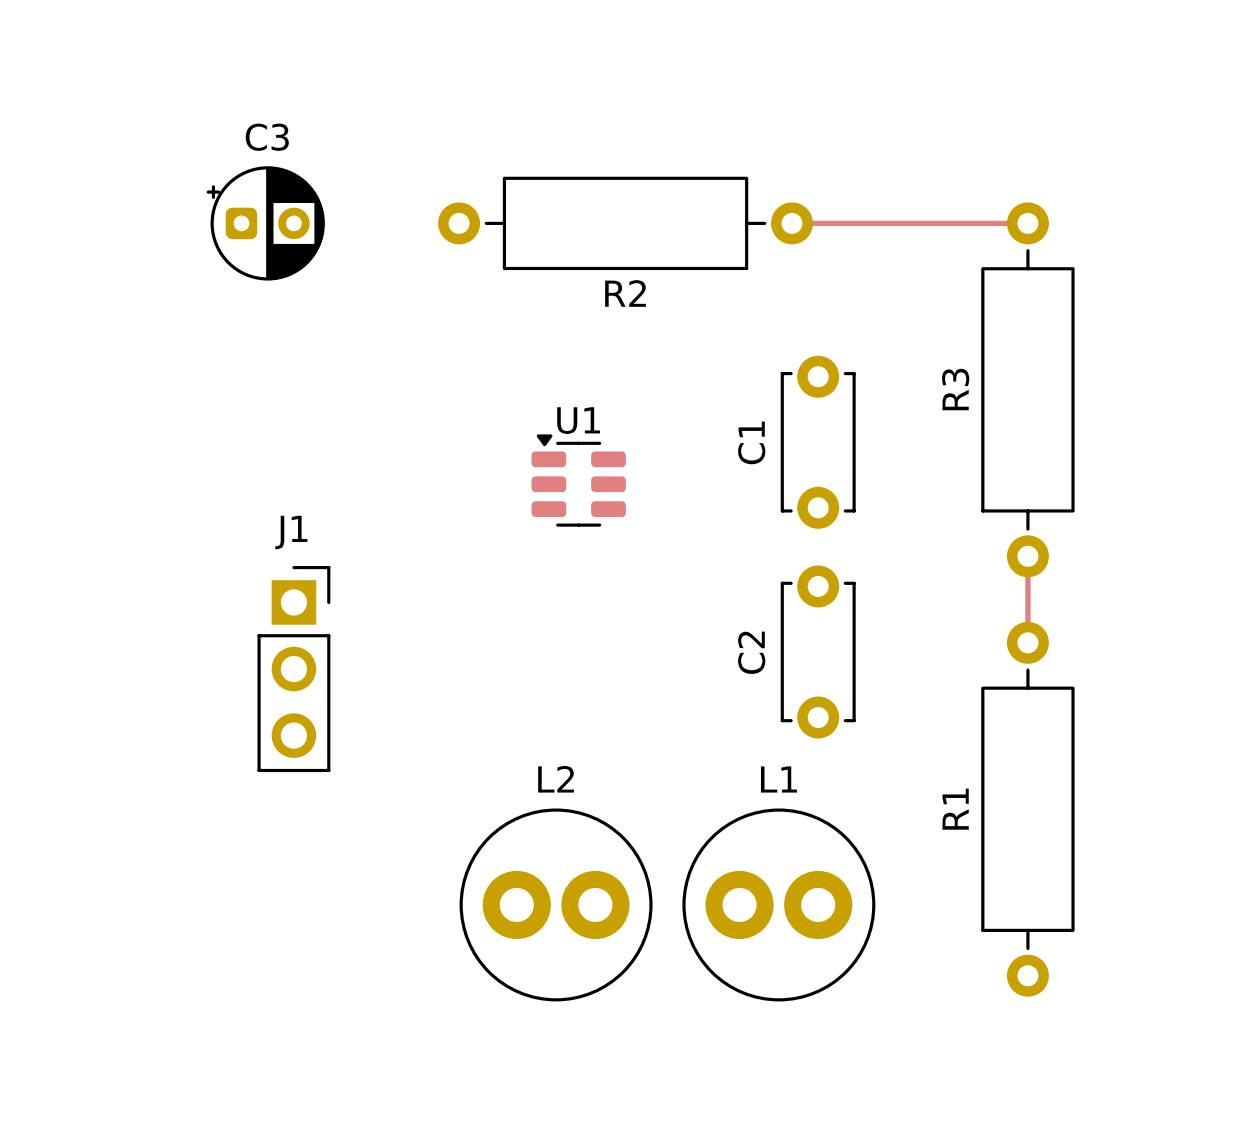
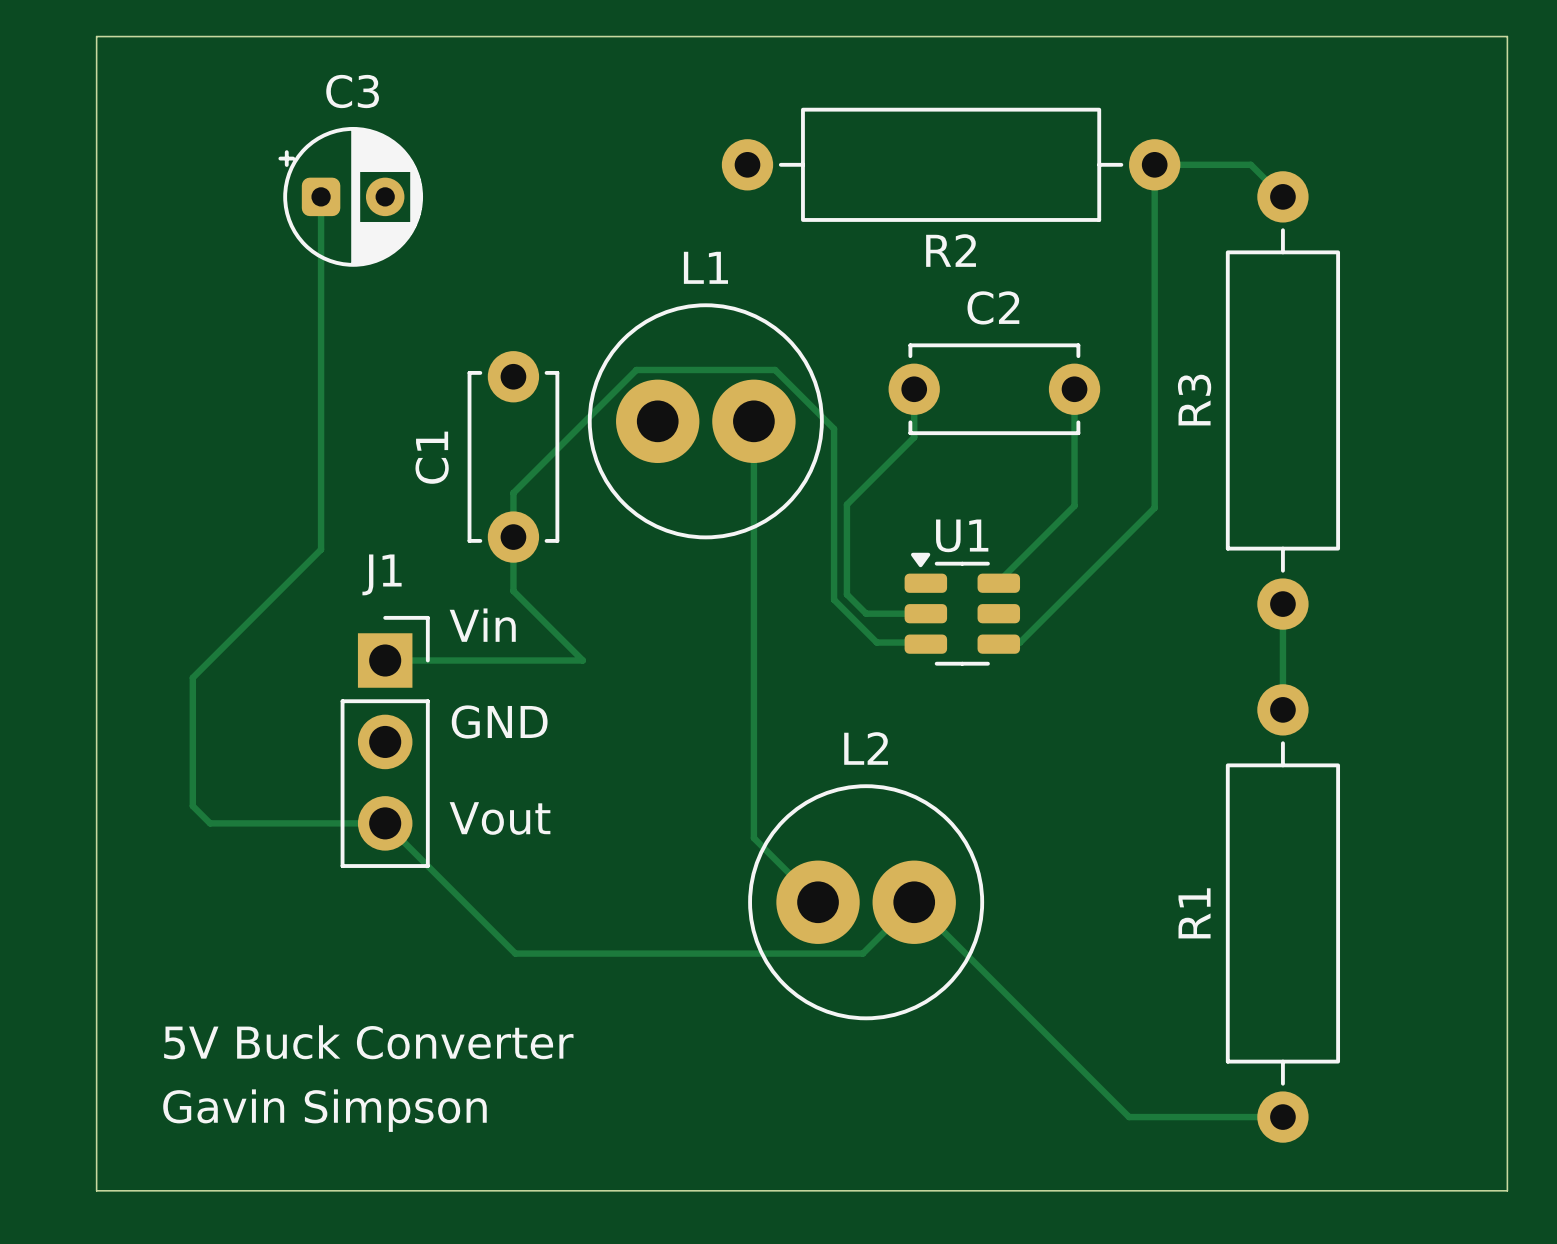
board edge: none -> (96, 36) (1507, 36) (1507, 1190) (96, 1190) (96, 36)
track: none -> (321, 196) (321, 549) (192, 677) (192, 806) (210, 823) (385, 823) (515, 953) (862, 953) (914, 902) (1129, 1117) (1282, 1117)
R2 position: (625, 223) -> (951, 164)
track: (791, 223) (1027, 223) -> (998, 642) (1020, 642) (1154, 507) (1154, 164) (1250, 164) (1282, 196)
track: none -> (914, 389) (914, 437) (846, 504) (846, 594) (866, 613) (925, 613)
track: none -> (1074, 389) (1074, 505) (998, 581)
track: none -> (753, 421) (753, 838) (818, 902)
C1 position: (818, 442) -> (513, 456)
U1 position: (578, 480) -> (962, 609)
text: none -> Vin (482, 625)
track: none -> (925, 642) (876, 642) (834, 599) (834, 428) (775, 369) (636, 369) (513, 493) (513, 591) (582, 660) (385, 660)
C2 rotation: 0° (818, 651) -> 90° clockwise (994, 389)
C2 position: (818, 651) -> (994, 389)
text: none -> GND (499, 722)
text: none -> Vout (500, 818)
L2 position: (556, 904) -> (866, 902)
L1 position: (778, 904) -> (705, 421)
text: none -> 5V Buck Converter (368, 1042)
text: none -> Gavin Simpson (324, 1110)

